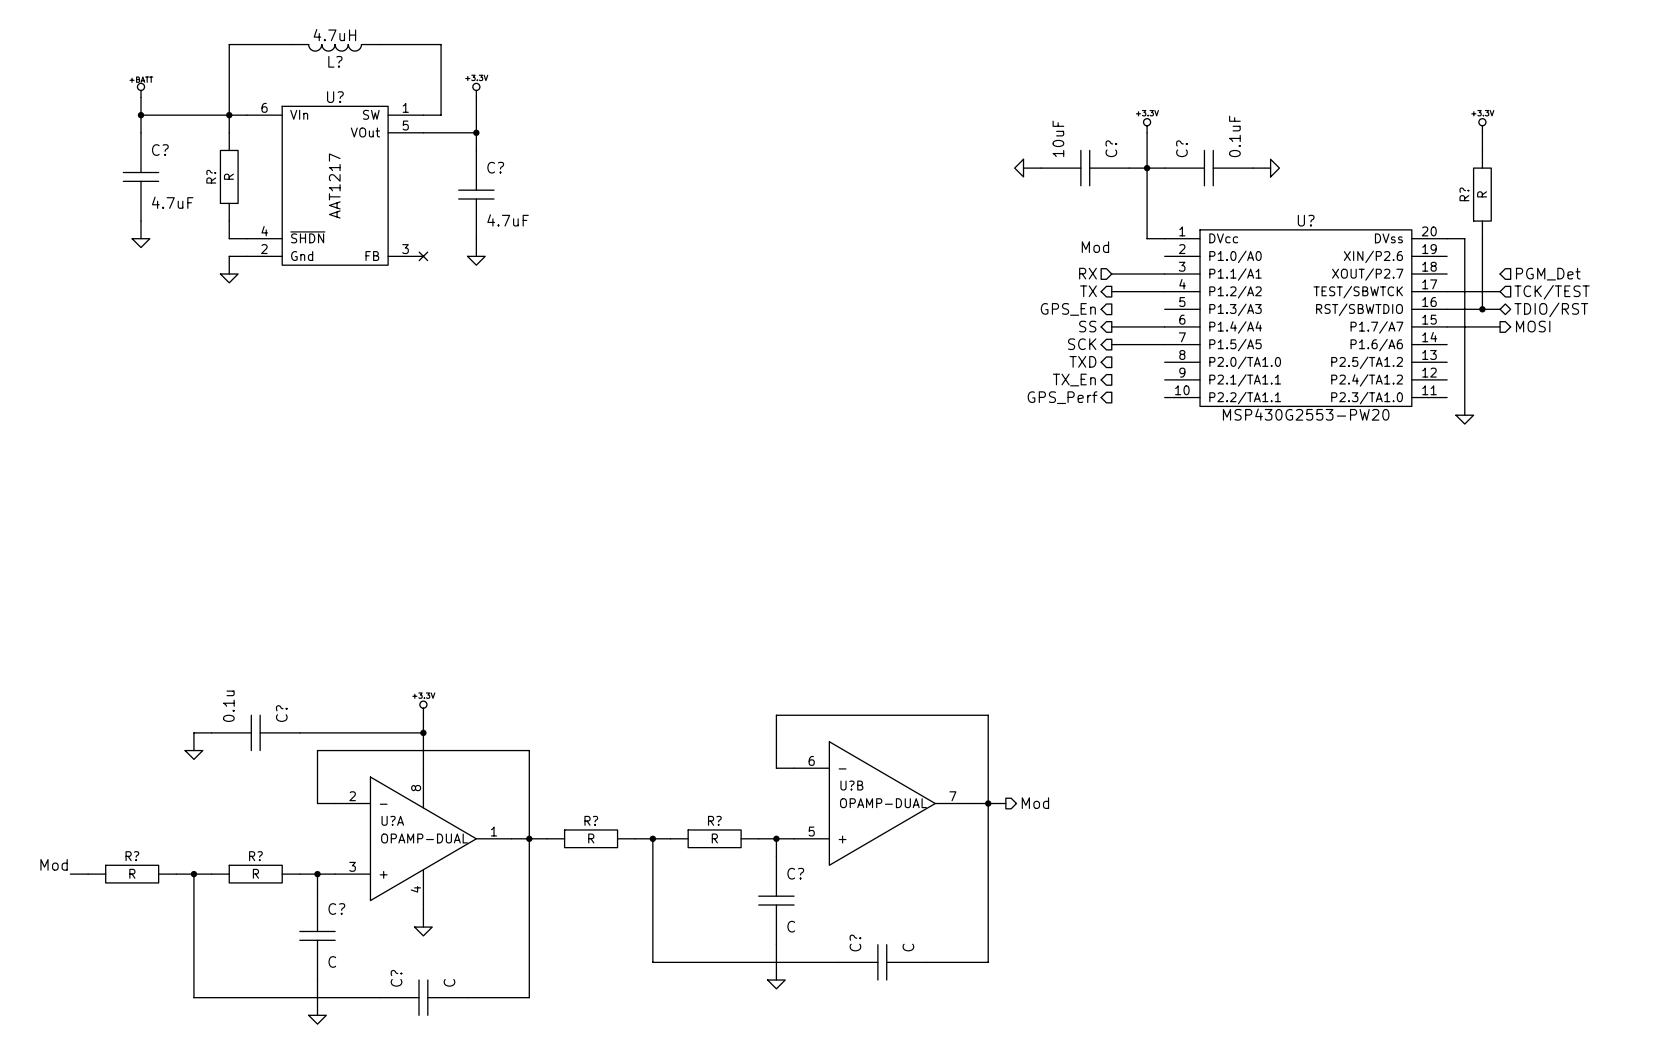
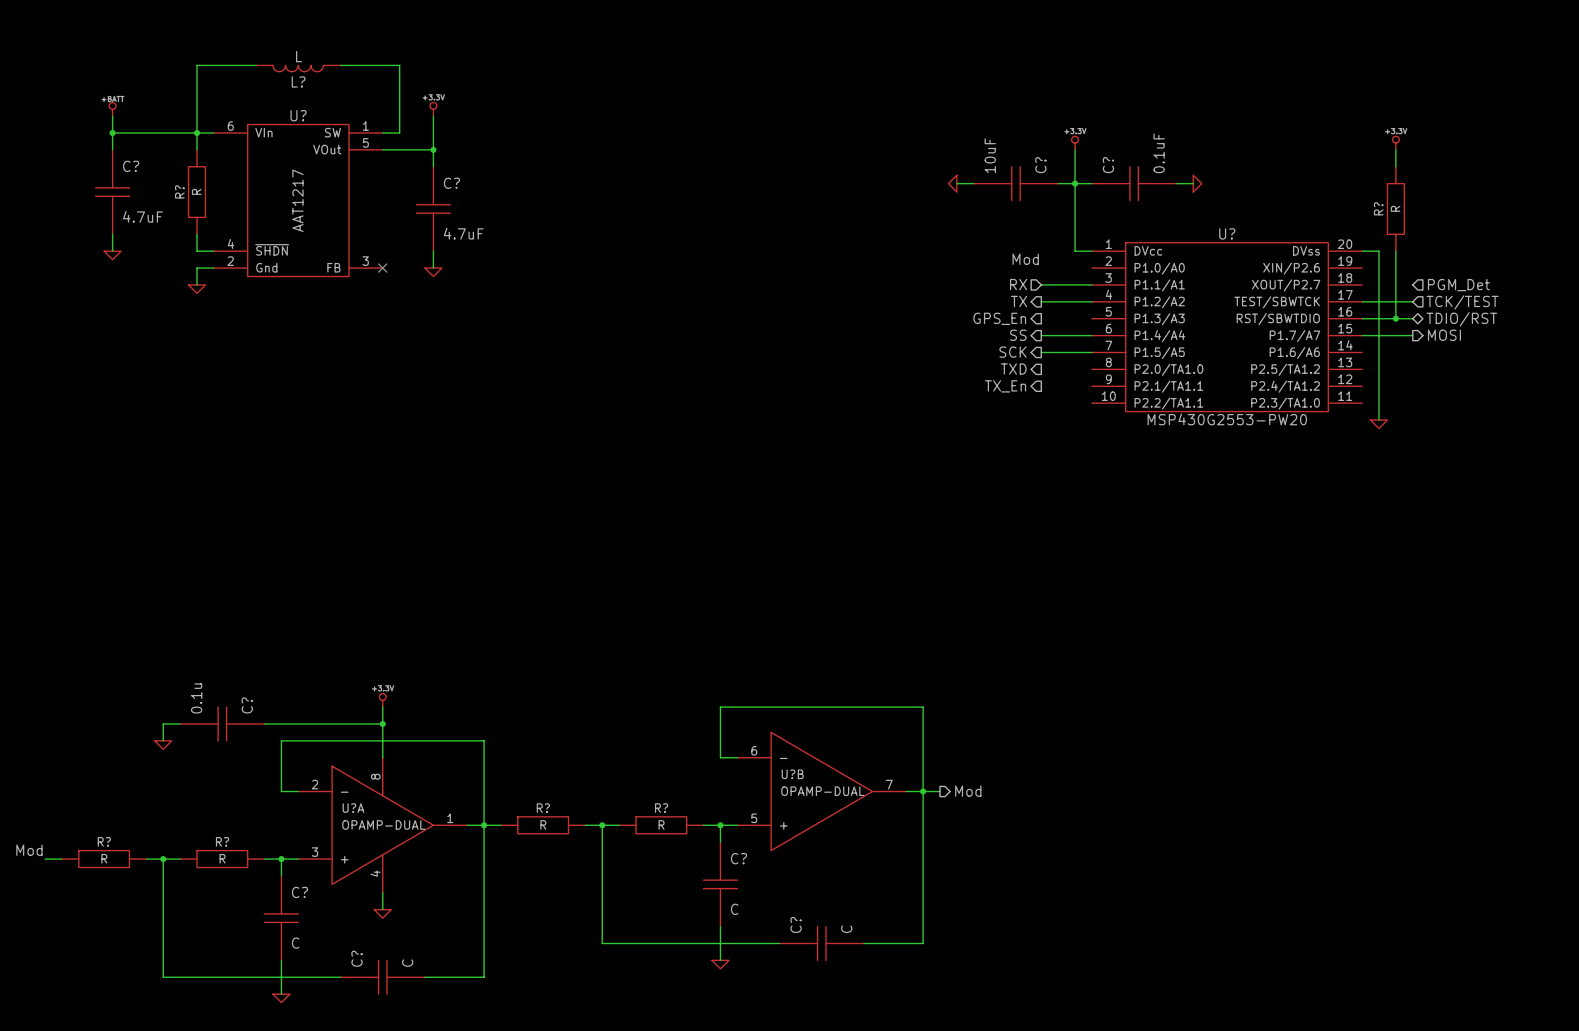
L? value: 4.7uH (334, 35) -> L (299, 56)
hierarchical label: GPS_Perf (1062, 397) -> none

